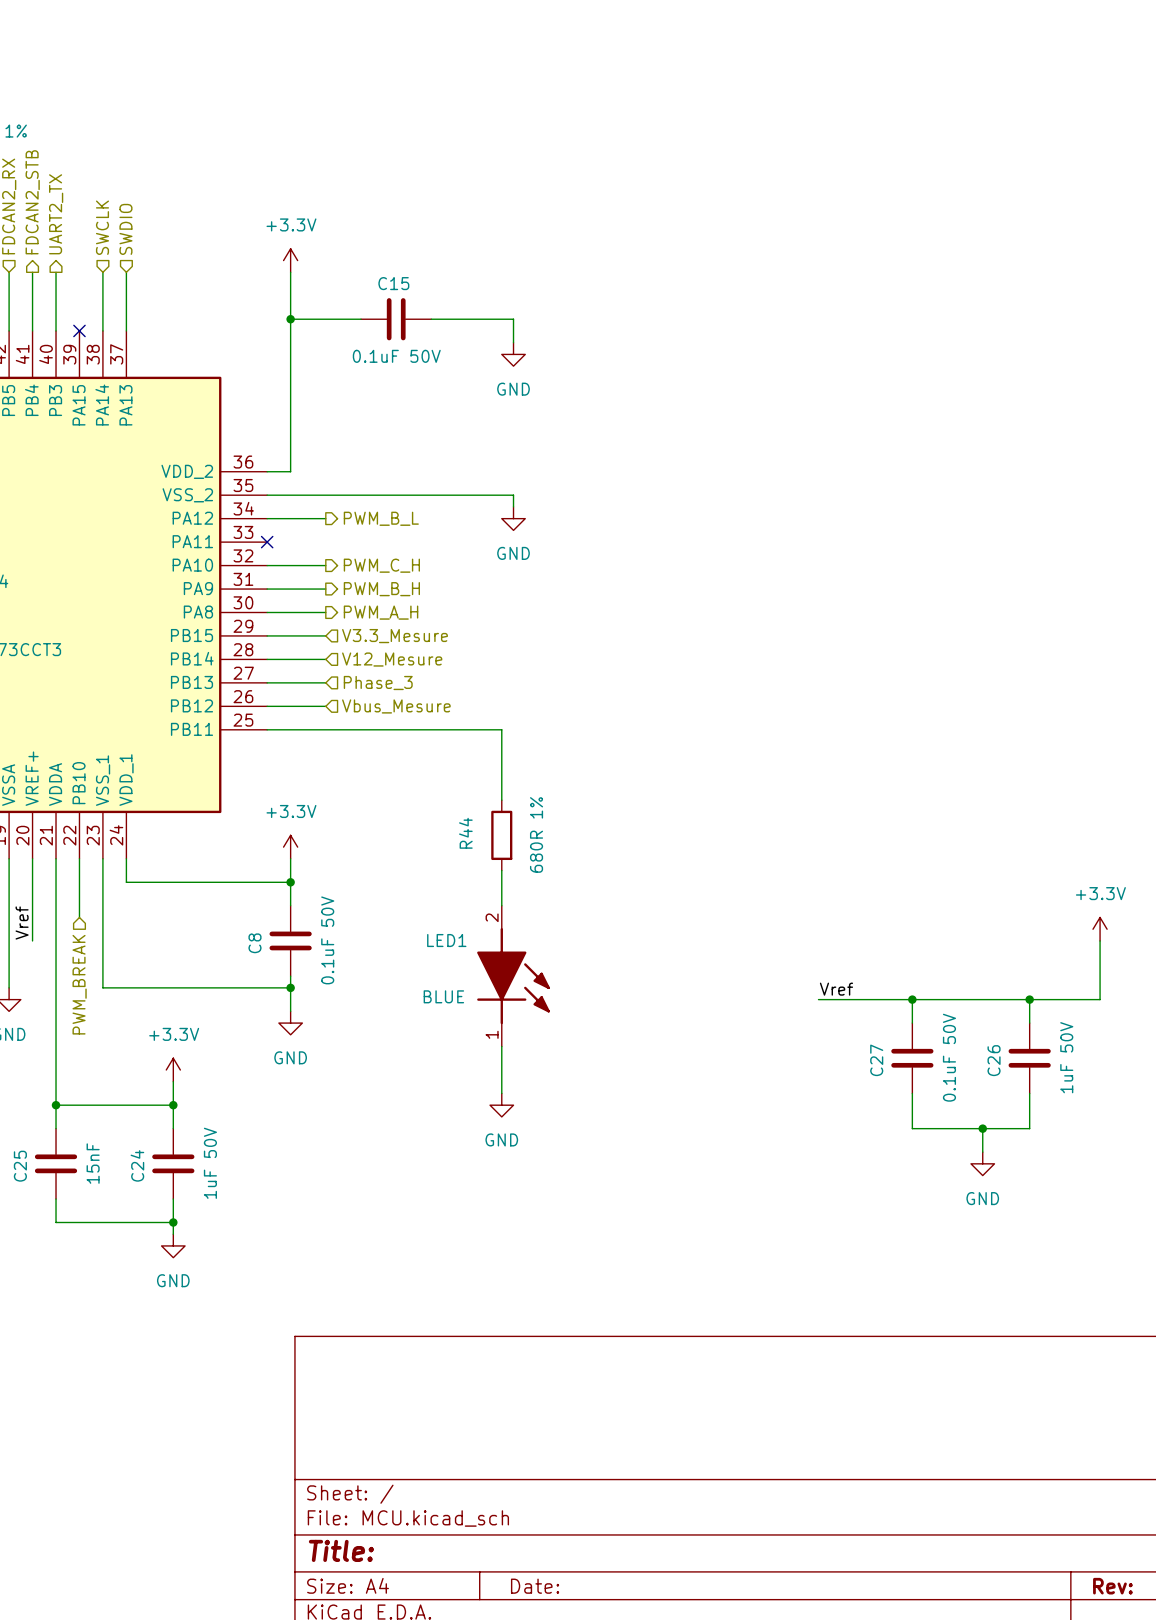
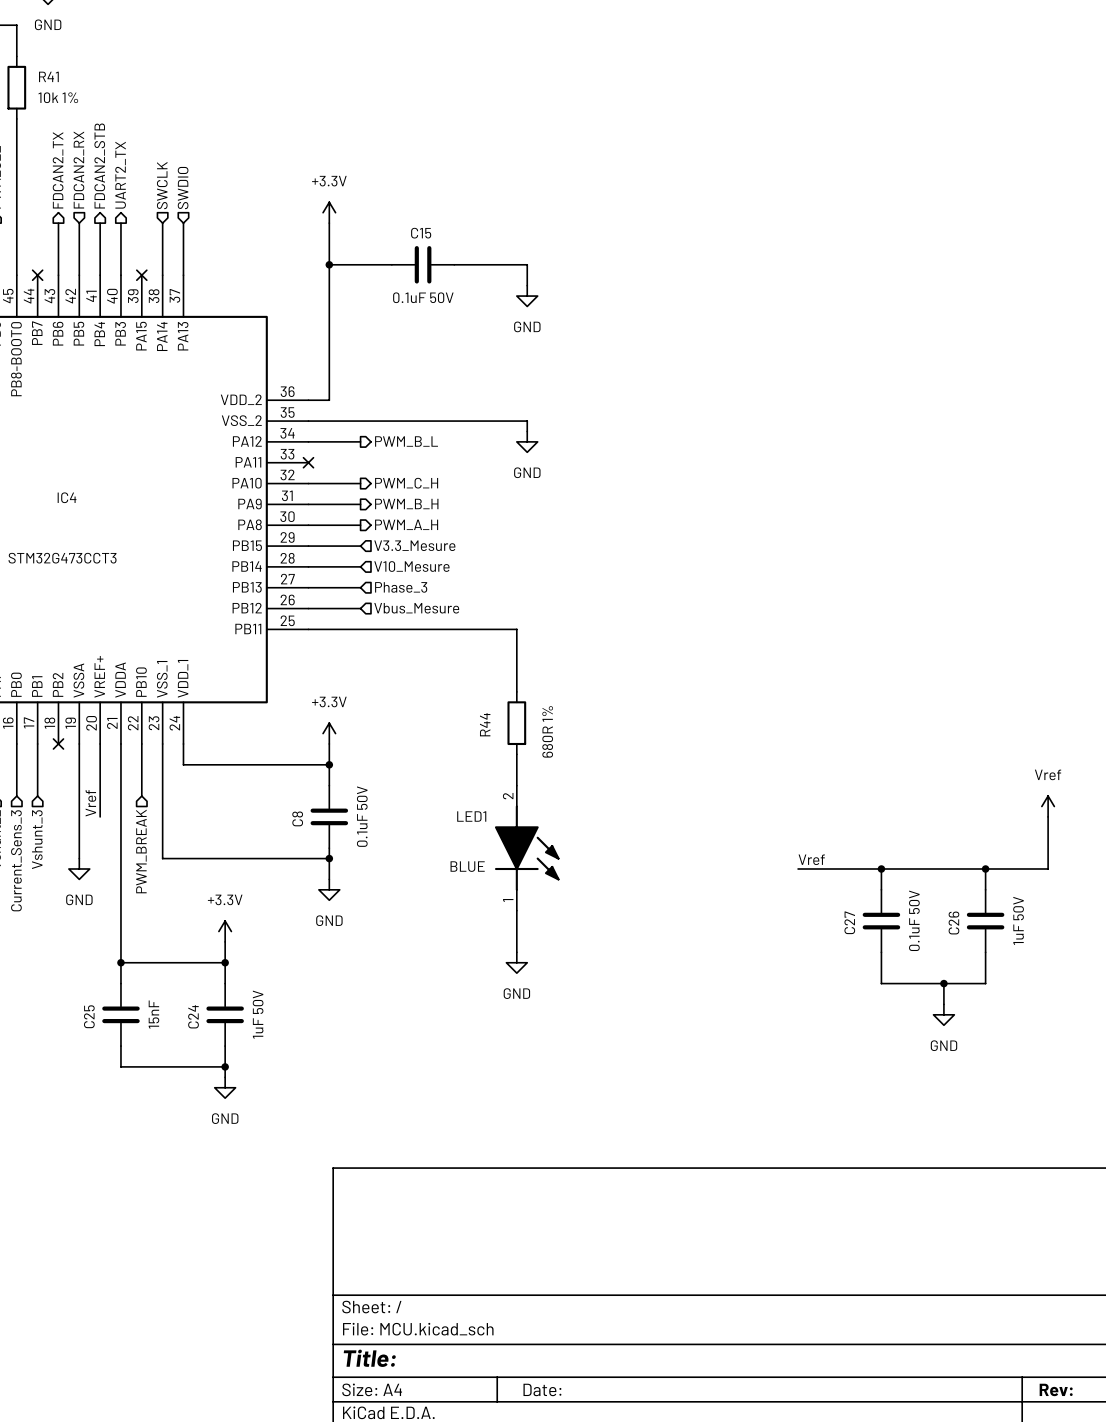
hierarchical label: V12_Mesure (392, 659) -> V10_Mesure (411, 566)
power symbol: +3.3V (1100, 929) -> Vref (1048, 806)

